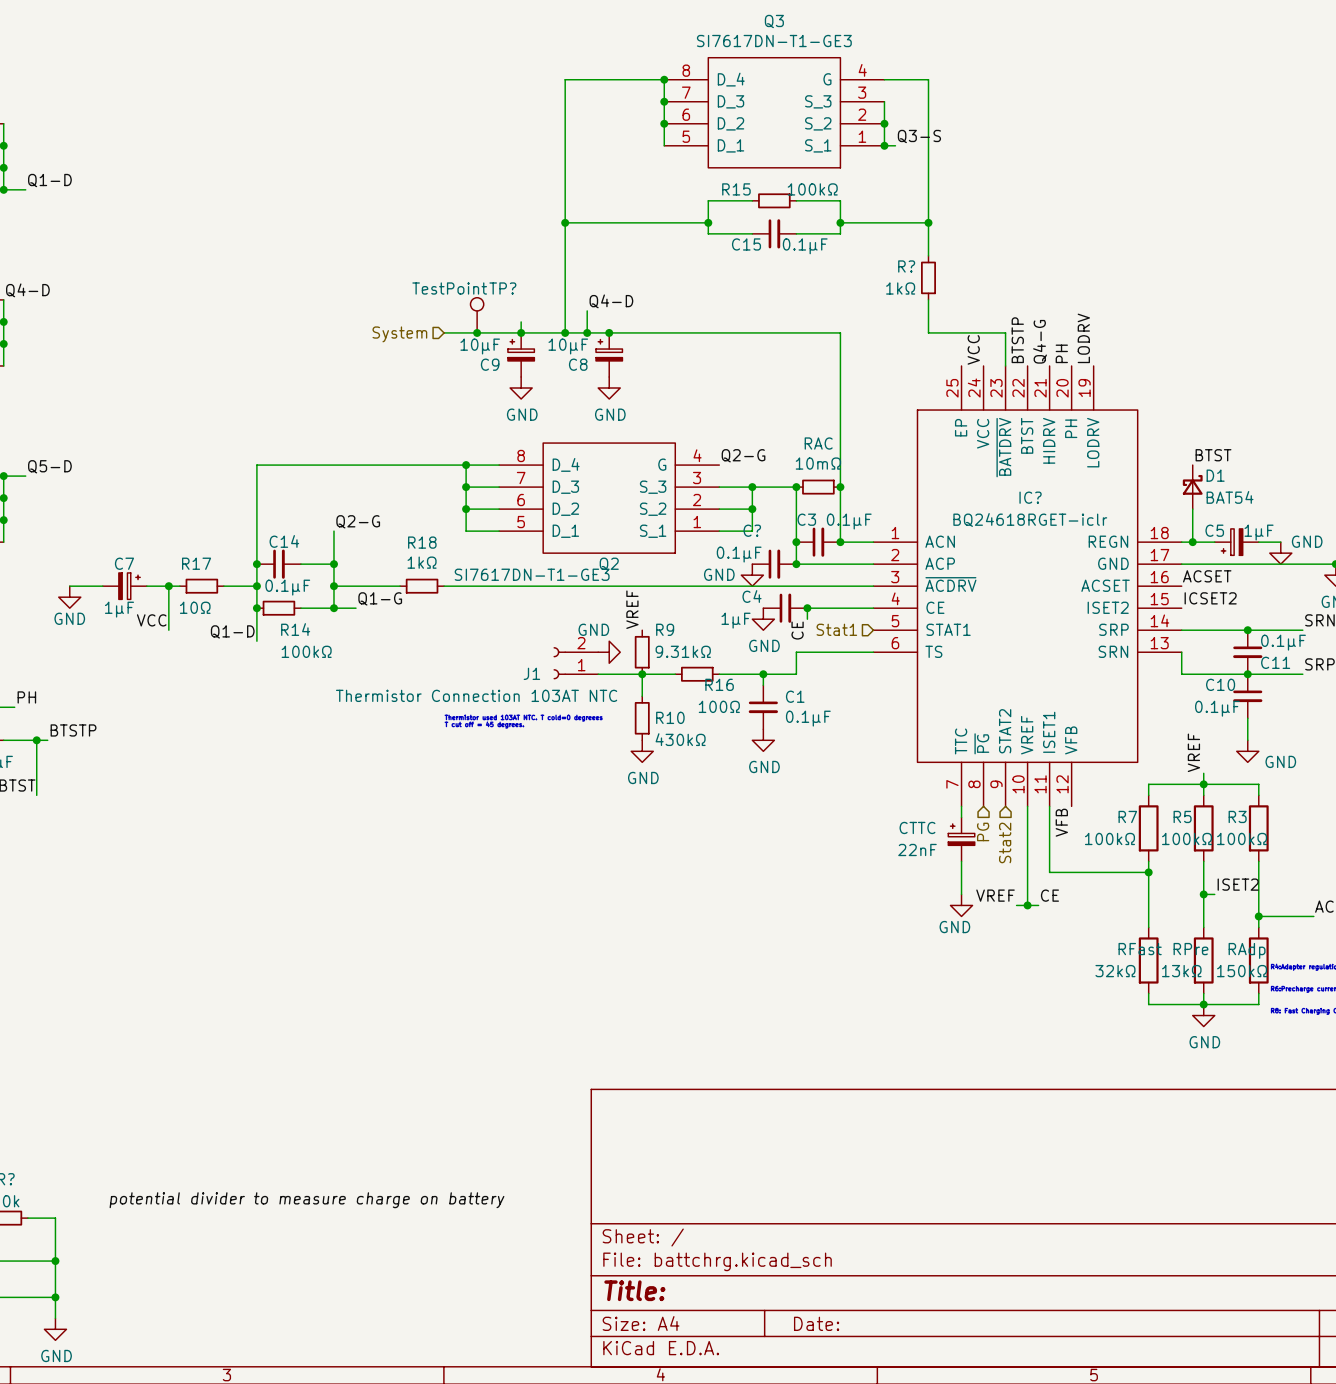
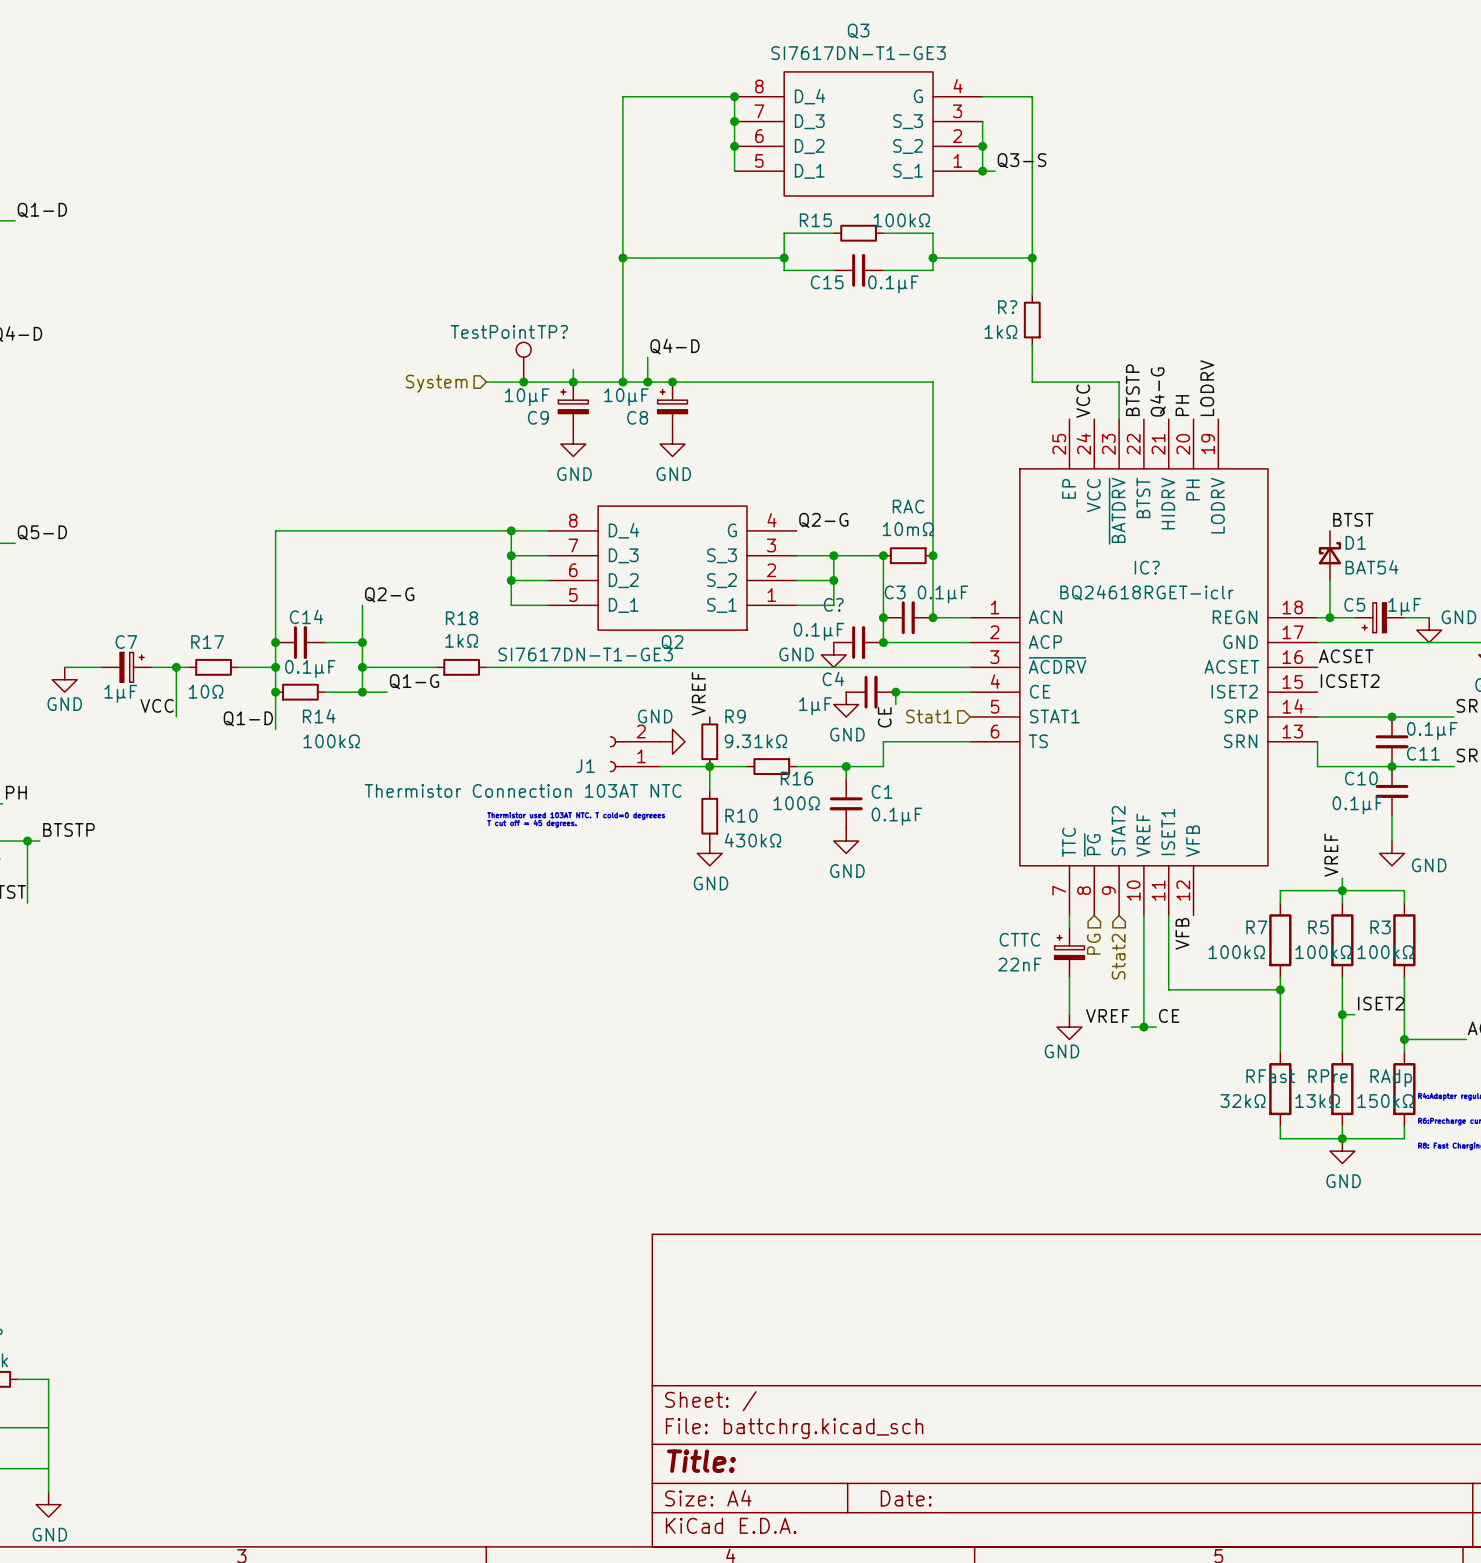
label: potential divider to measure charge on battery (306, 1200) -> none
junction: (55, 1261) -> none
junction: (55, 1297) -> none

